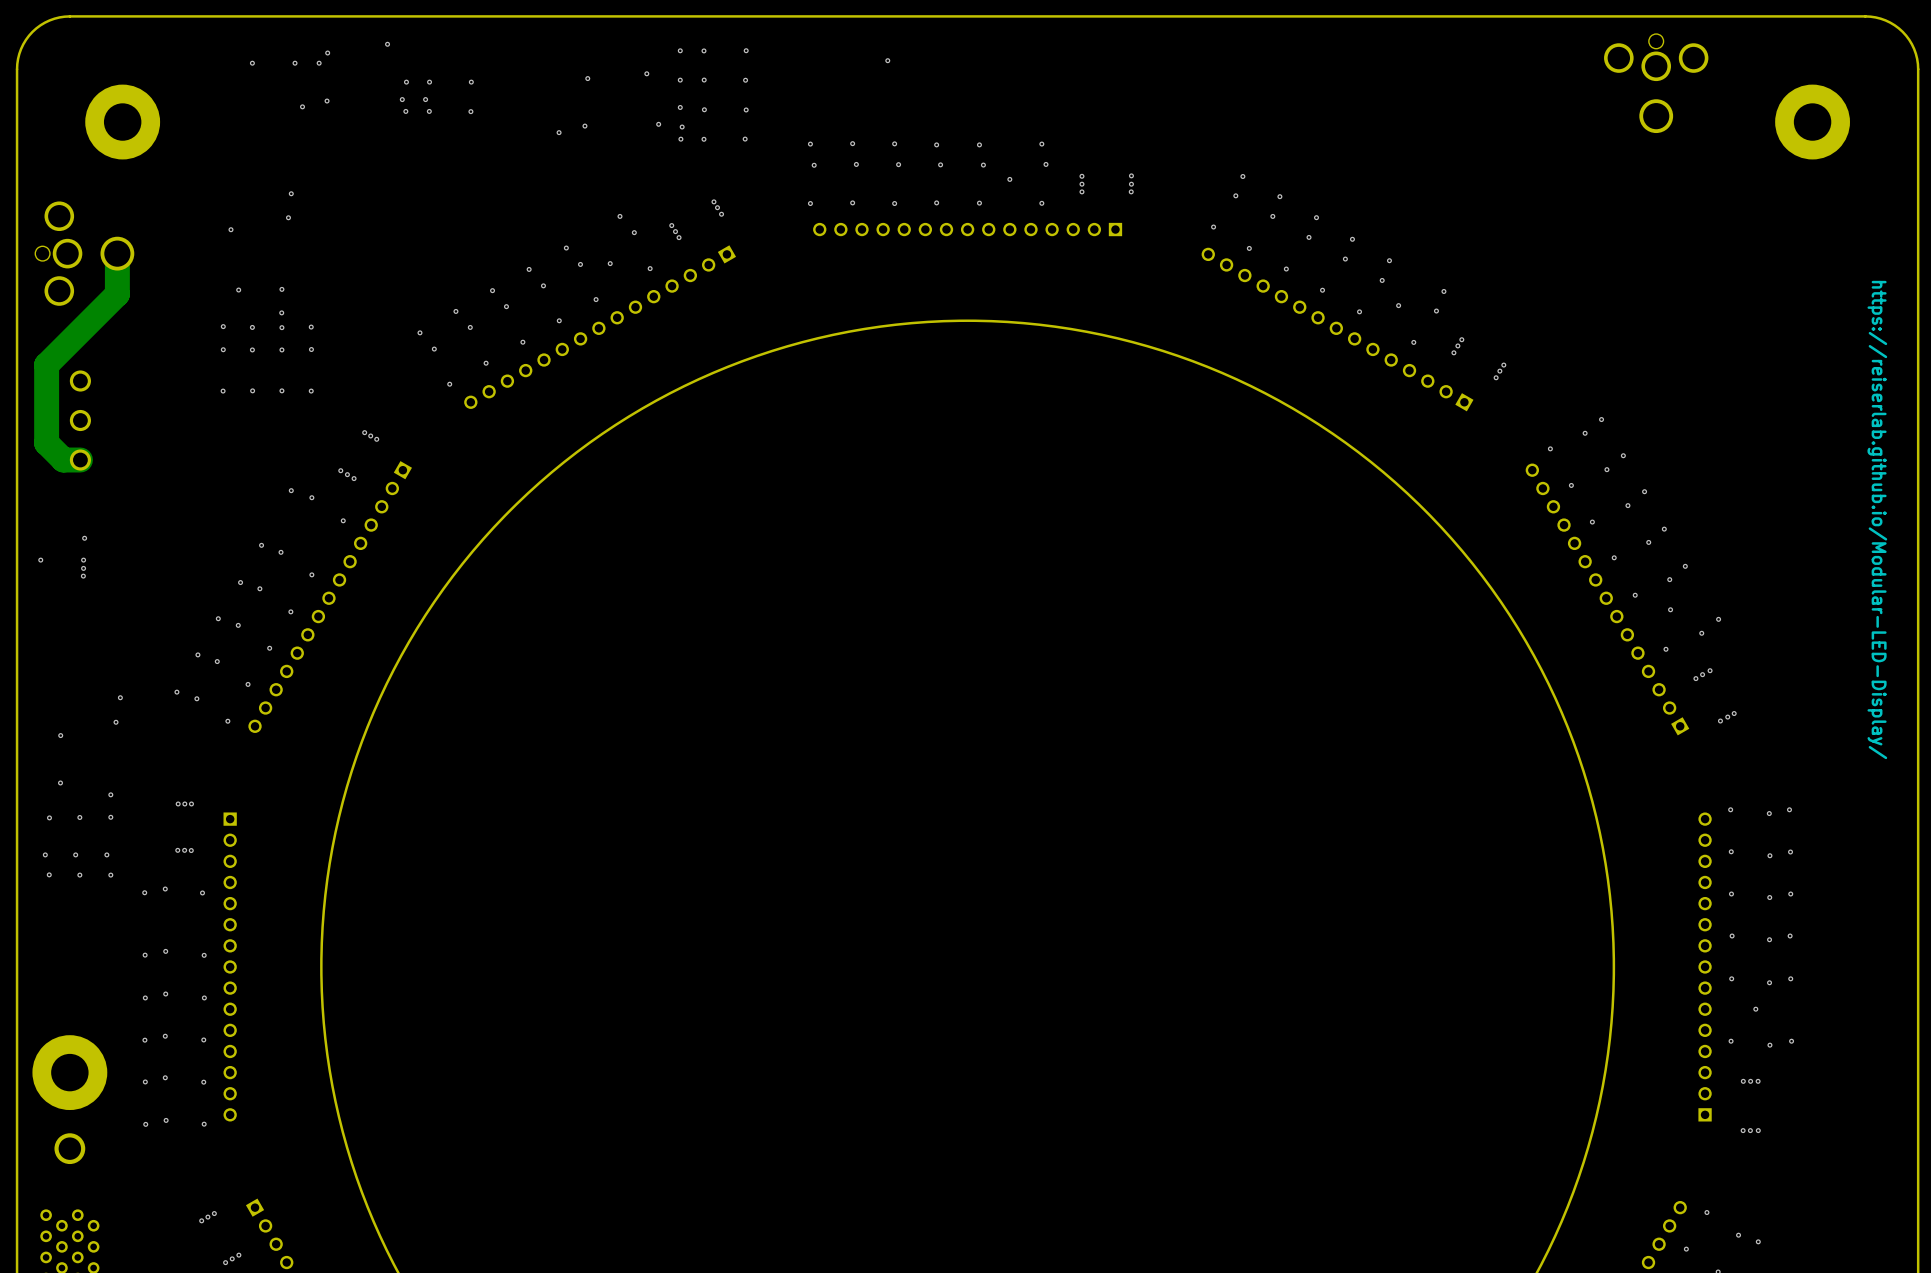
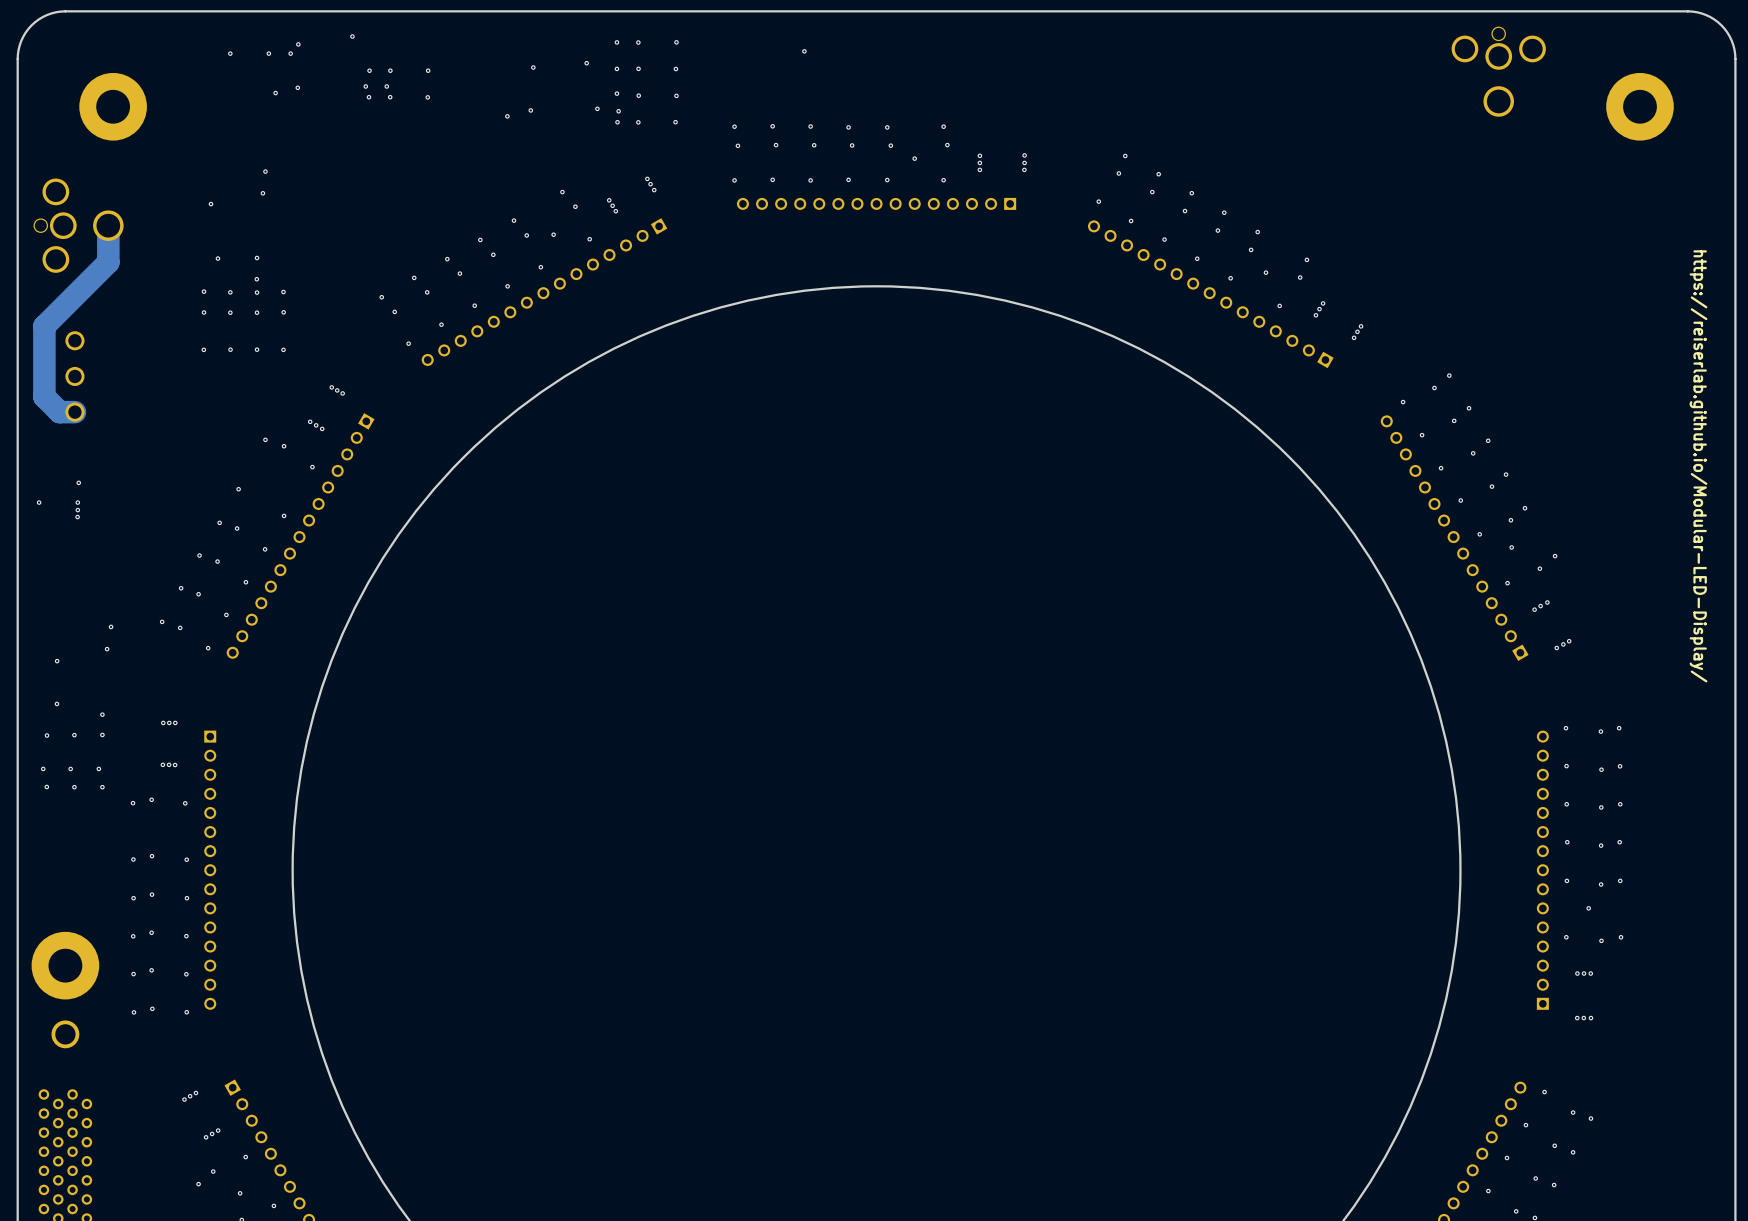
via: (281, 552) -> none

